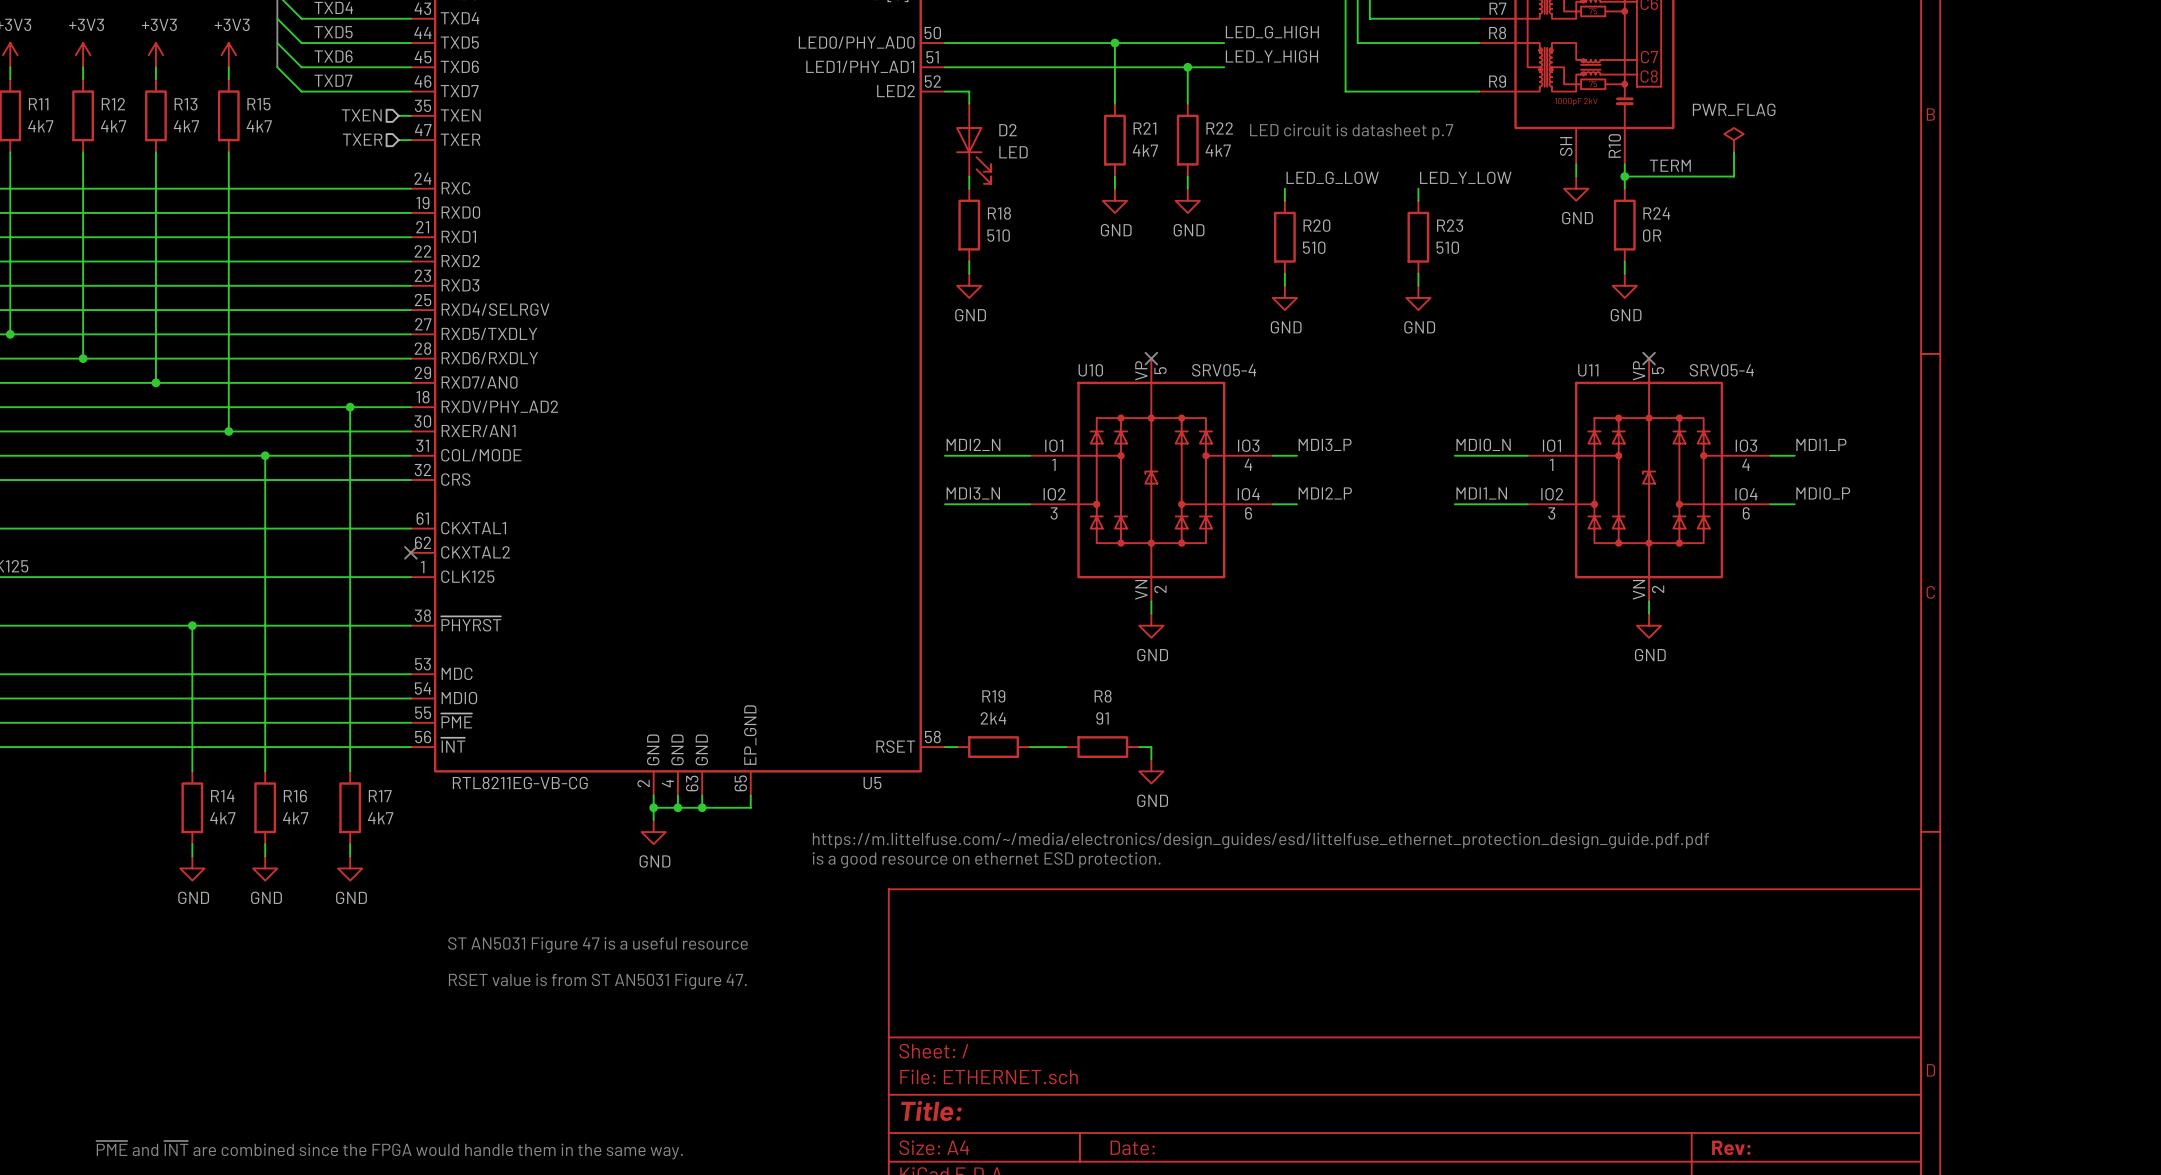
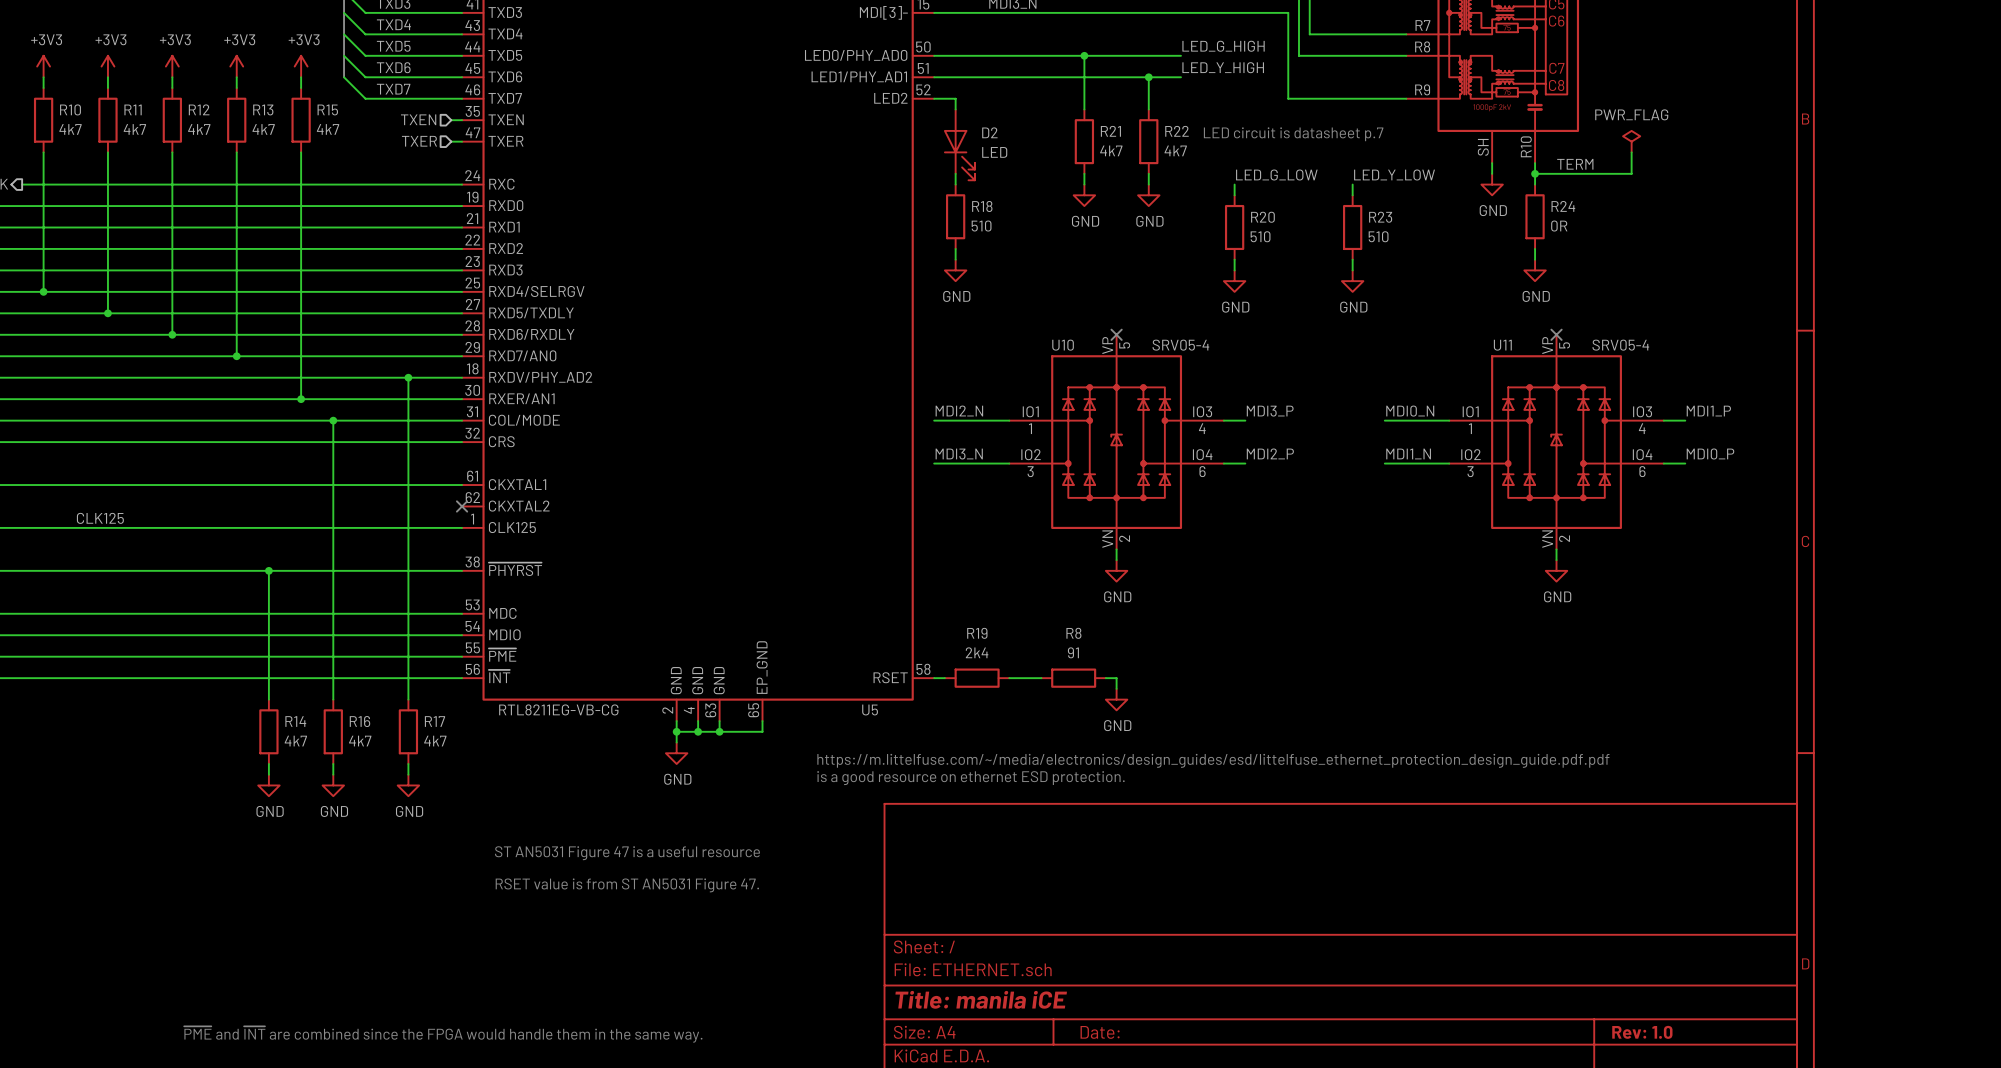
title block: Title: (931, 1110) -> Title: manila iCE (981, 999)
title block: Rev: (1731, 1147) -> Rev: 1.0 (1642, 1032)

